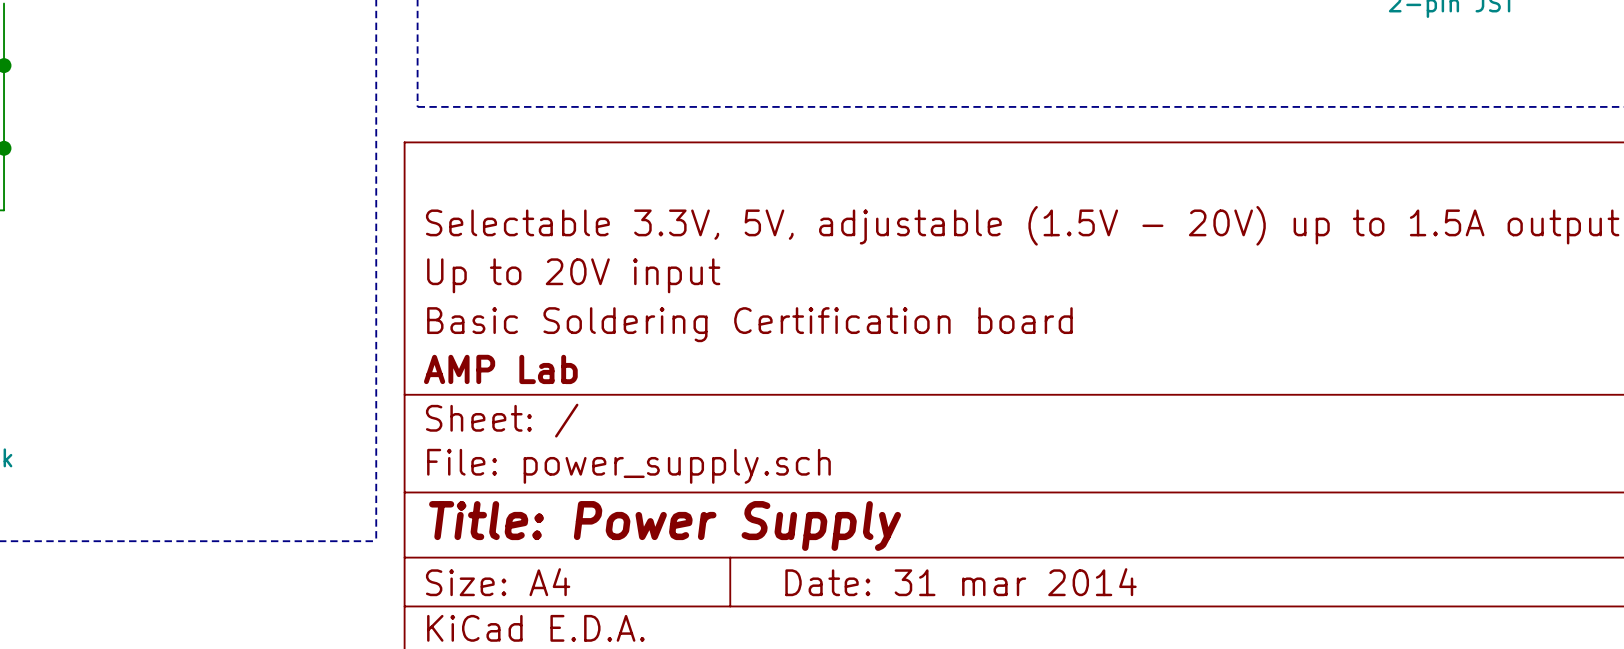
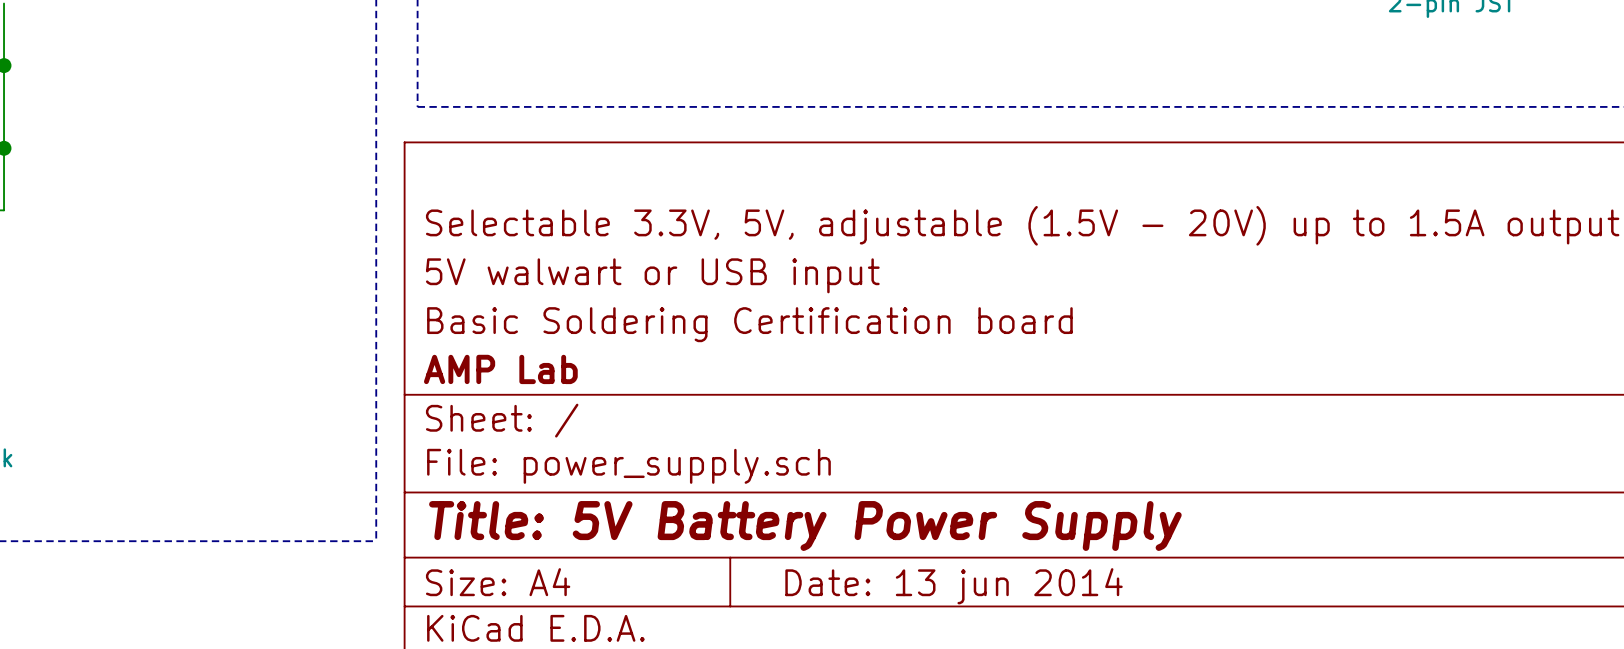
title block: Up to 20V input (573, 275) -> 5V walwart or USB input (652, 275)
title block: Title: Power Supply (665, 525) -> Title: 5V Battery Power Supply (805, 525)
title block: Date: 31 mar 2014 (961, 582) -> Date: 13 jun 2014 (954, 586)

